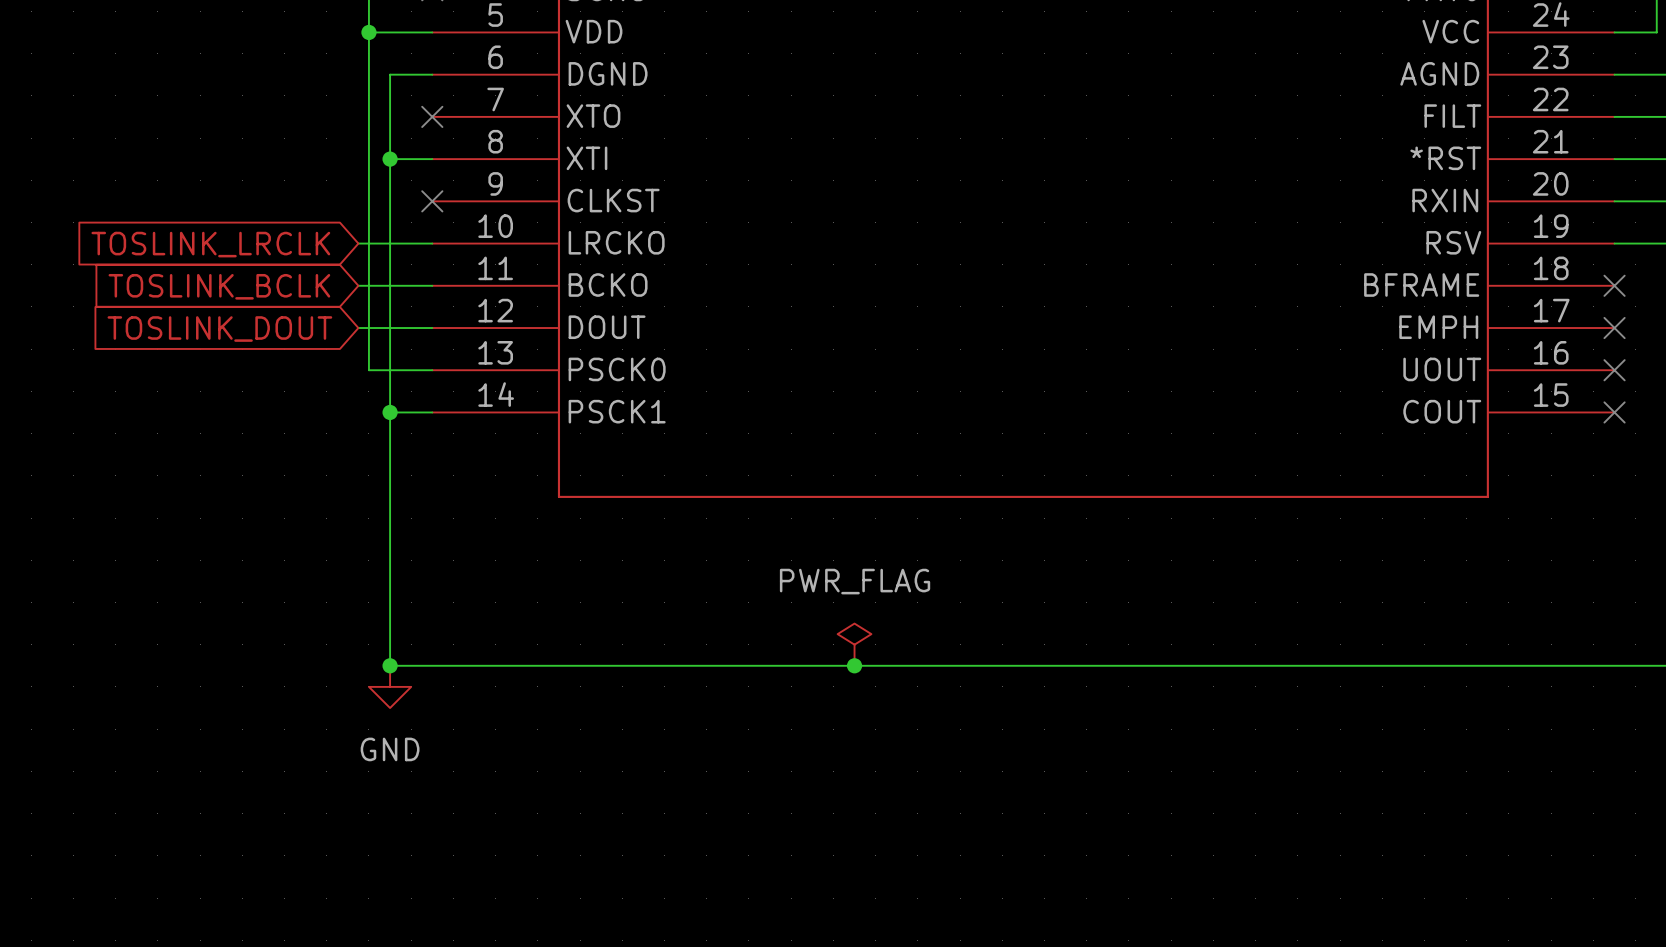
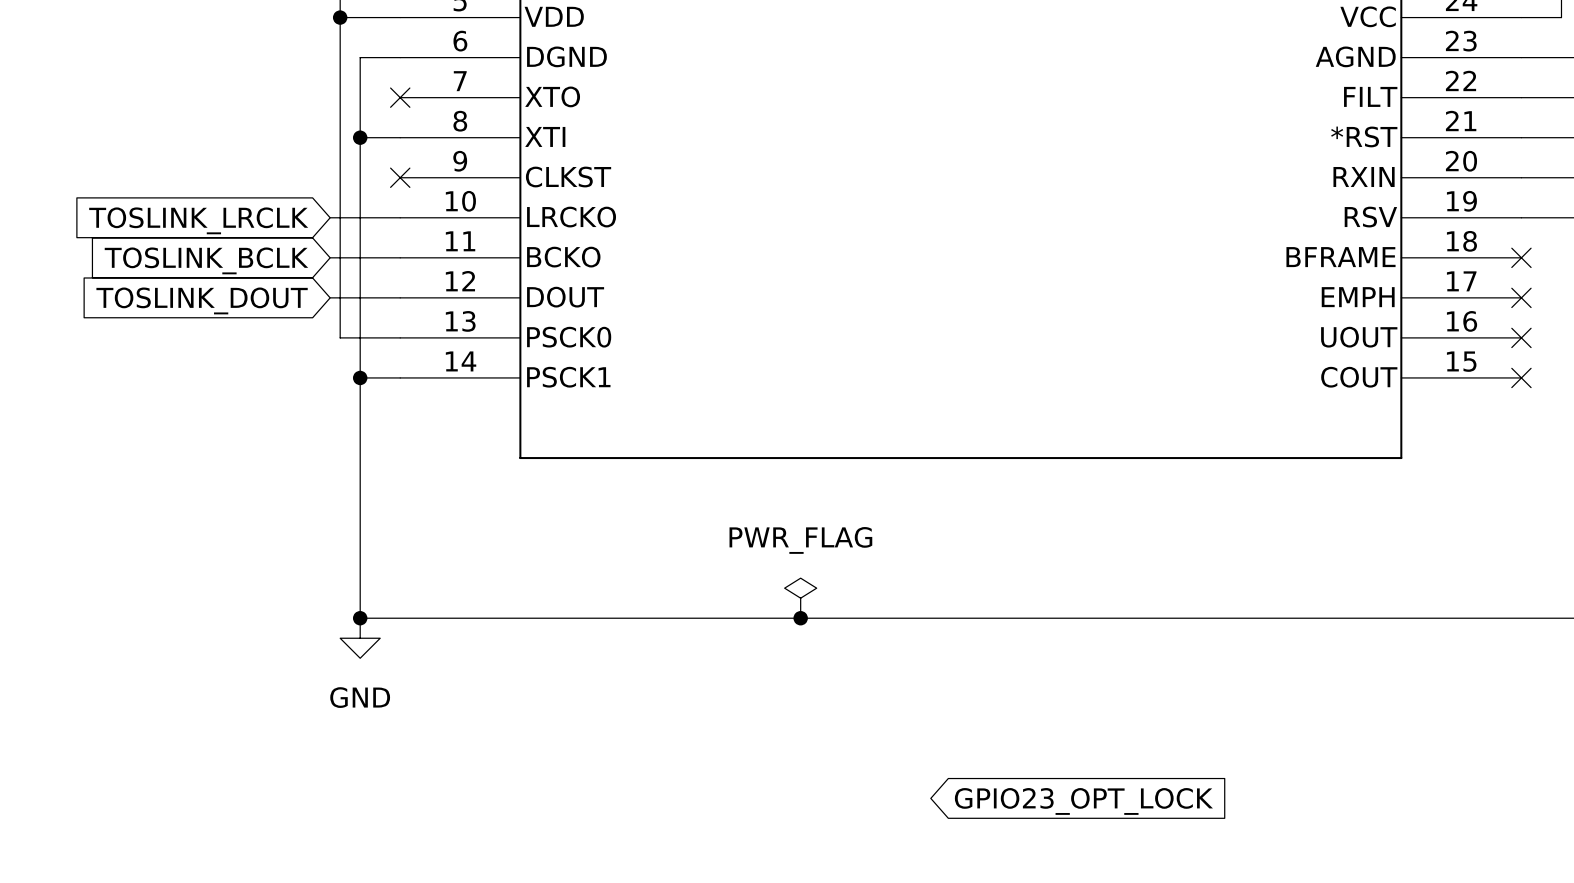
global label: none -> GPIO23_OPT_LOCK (1083, 801)

